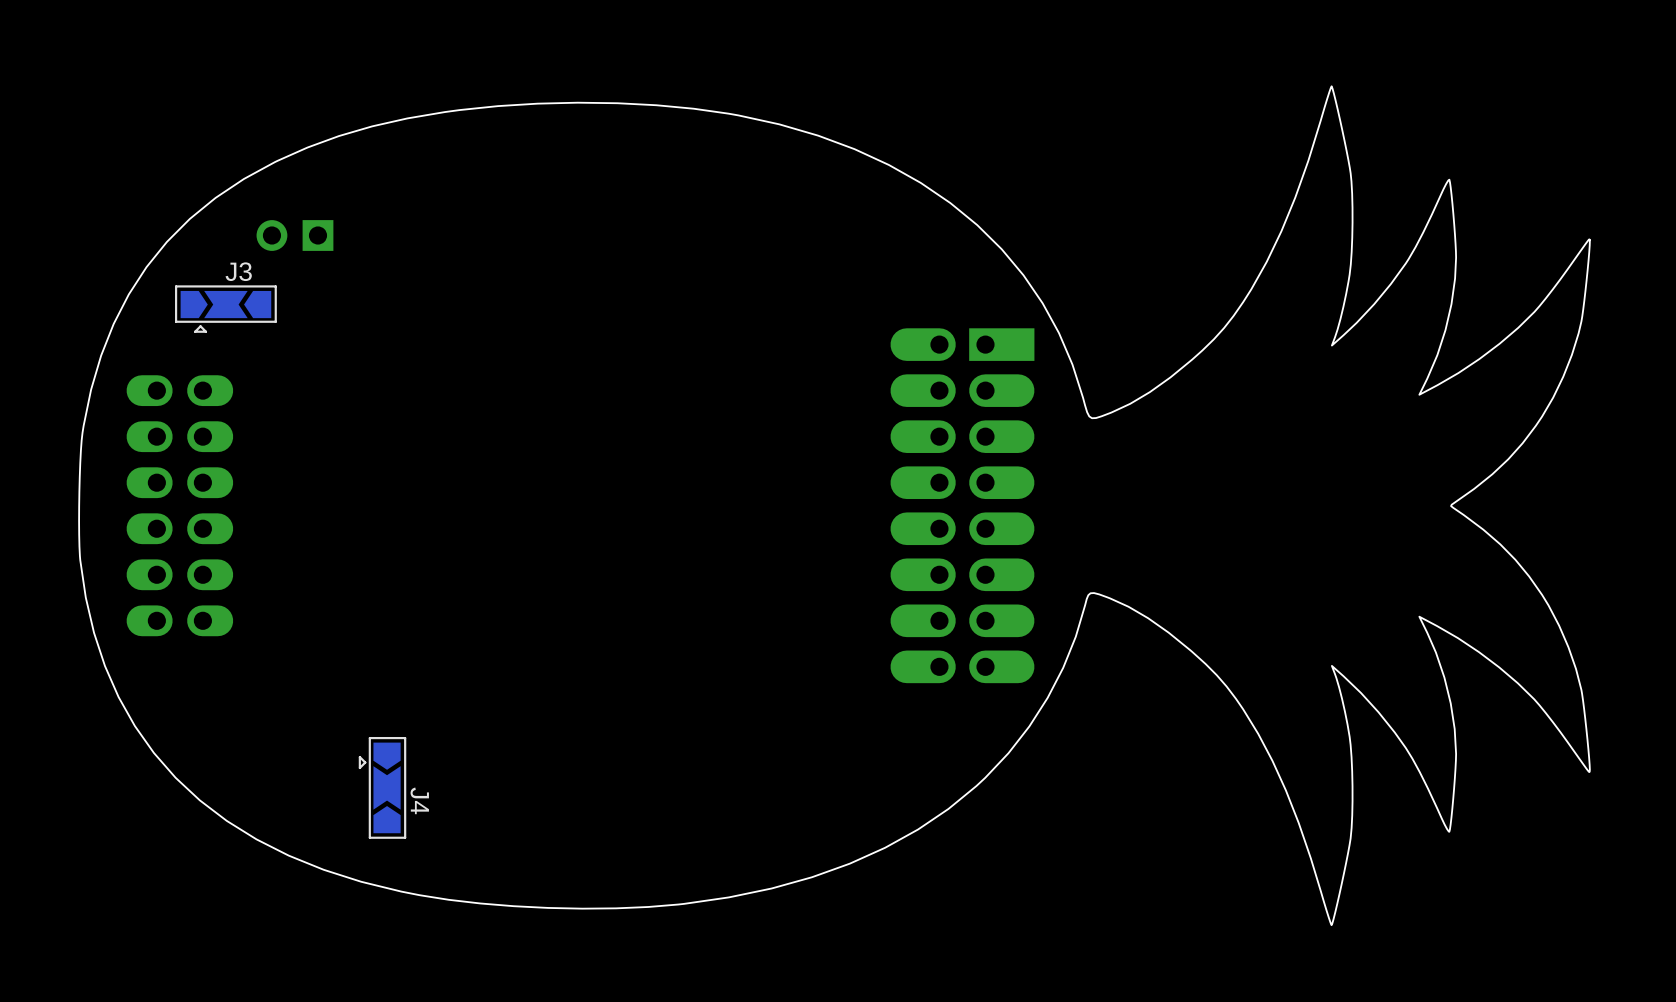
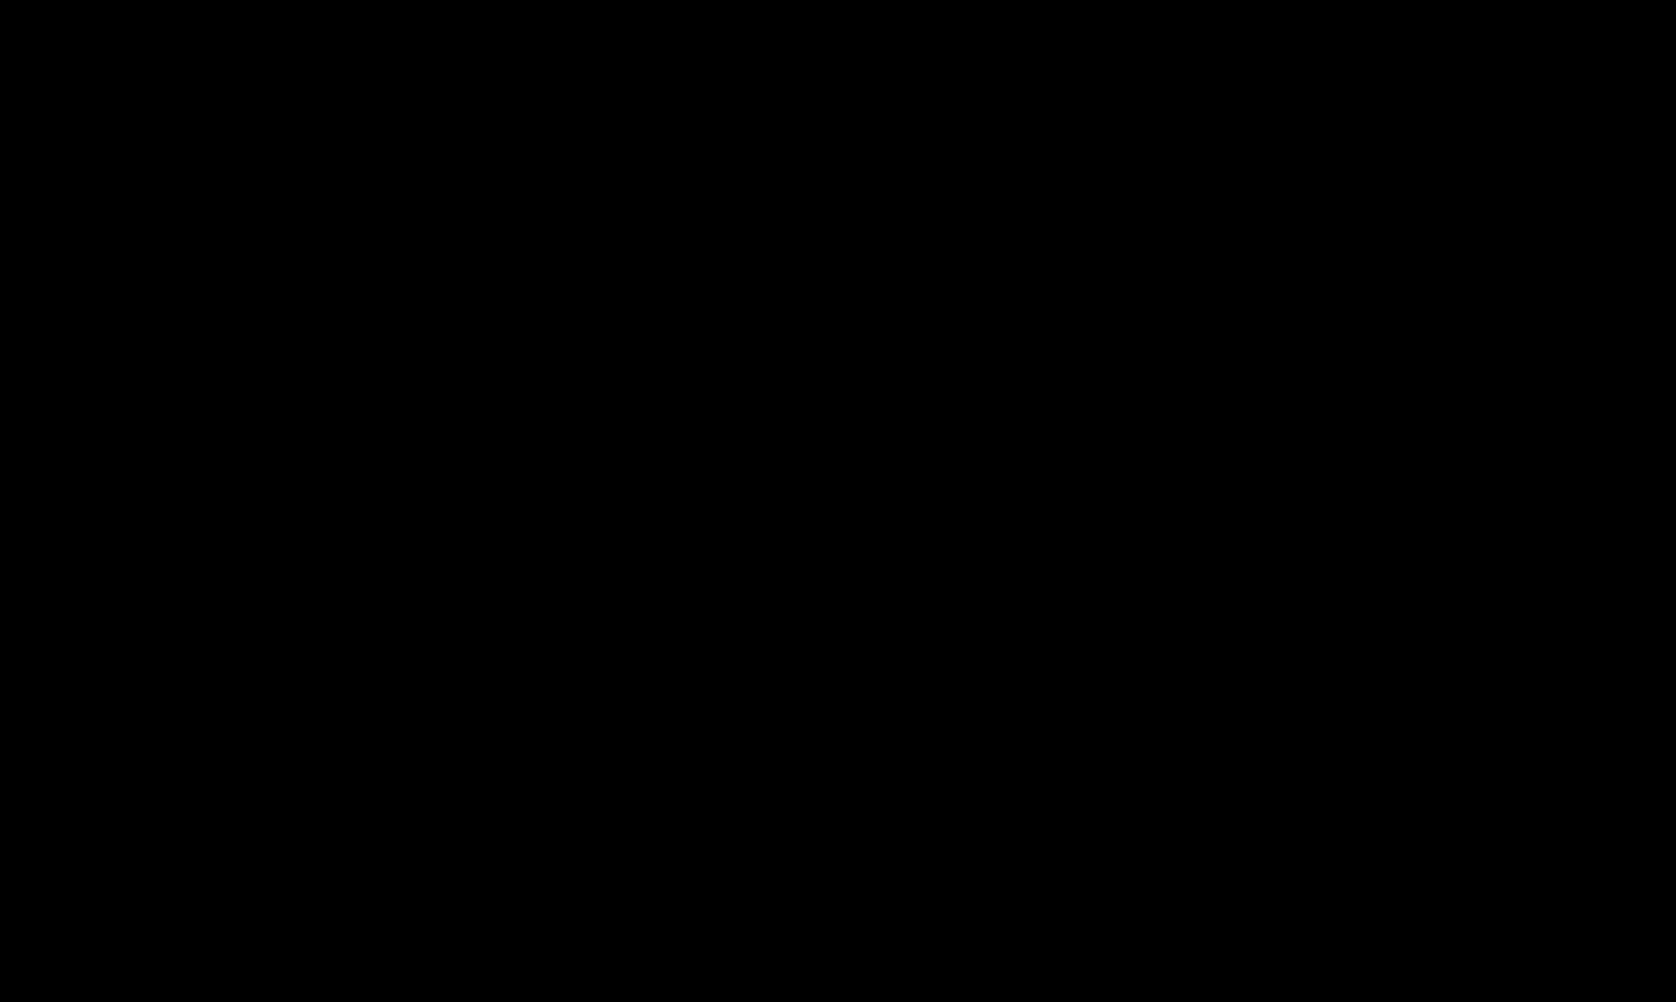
drawing: [78, 85, 1591, 927] -> none
part: (294, 235) -> none
J3: (225, 309) -> none
part: (179, 505) -> none
part: (962, 505) -> none
J4: (382, 787) -> none

